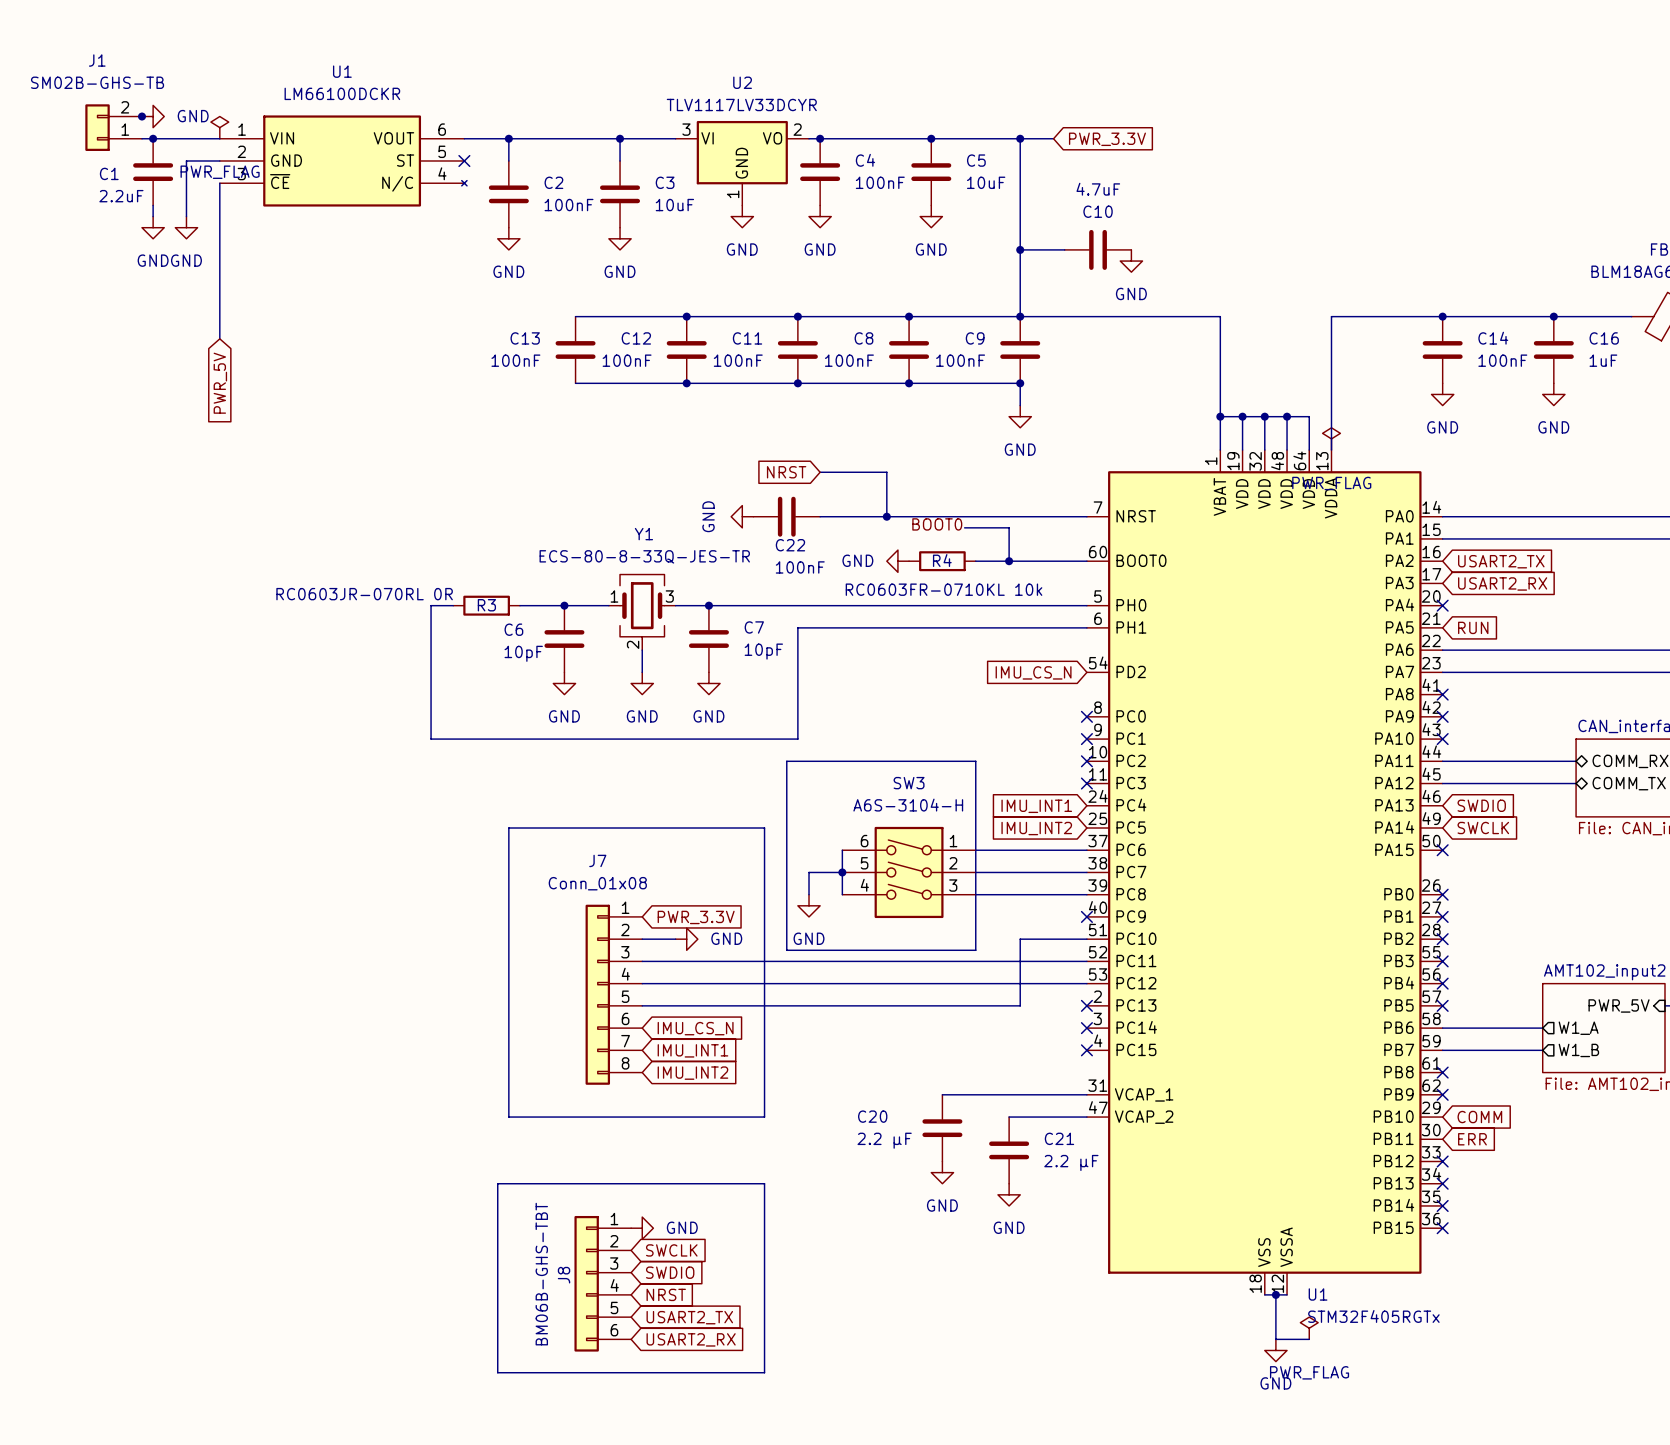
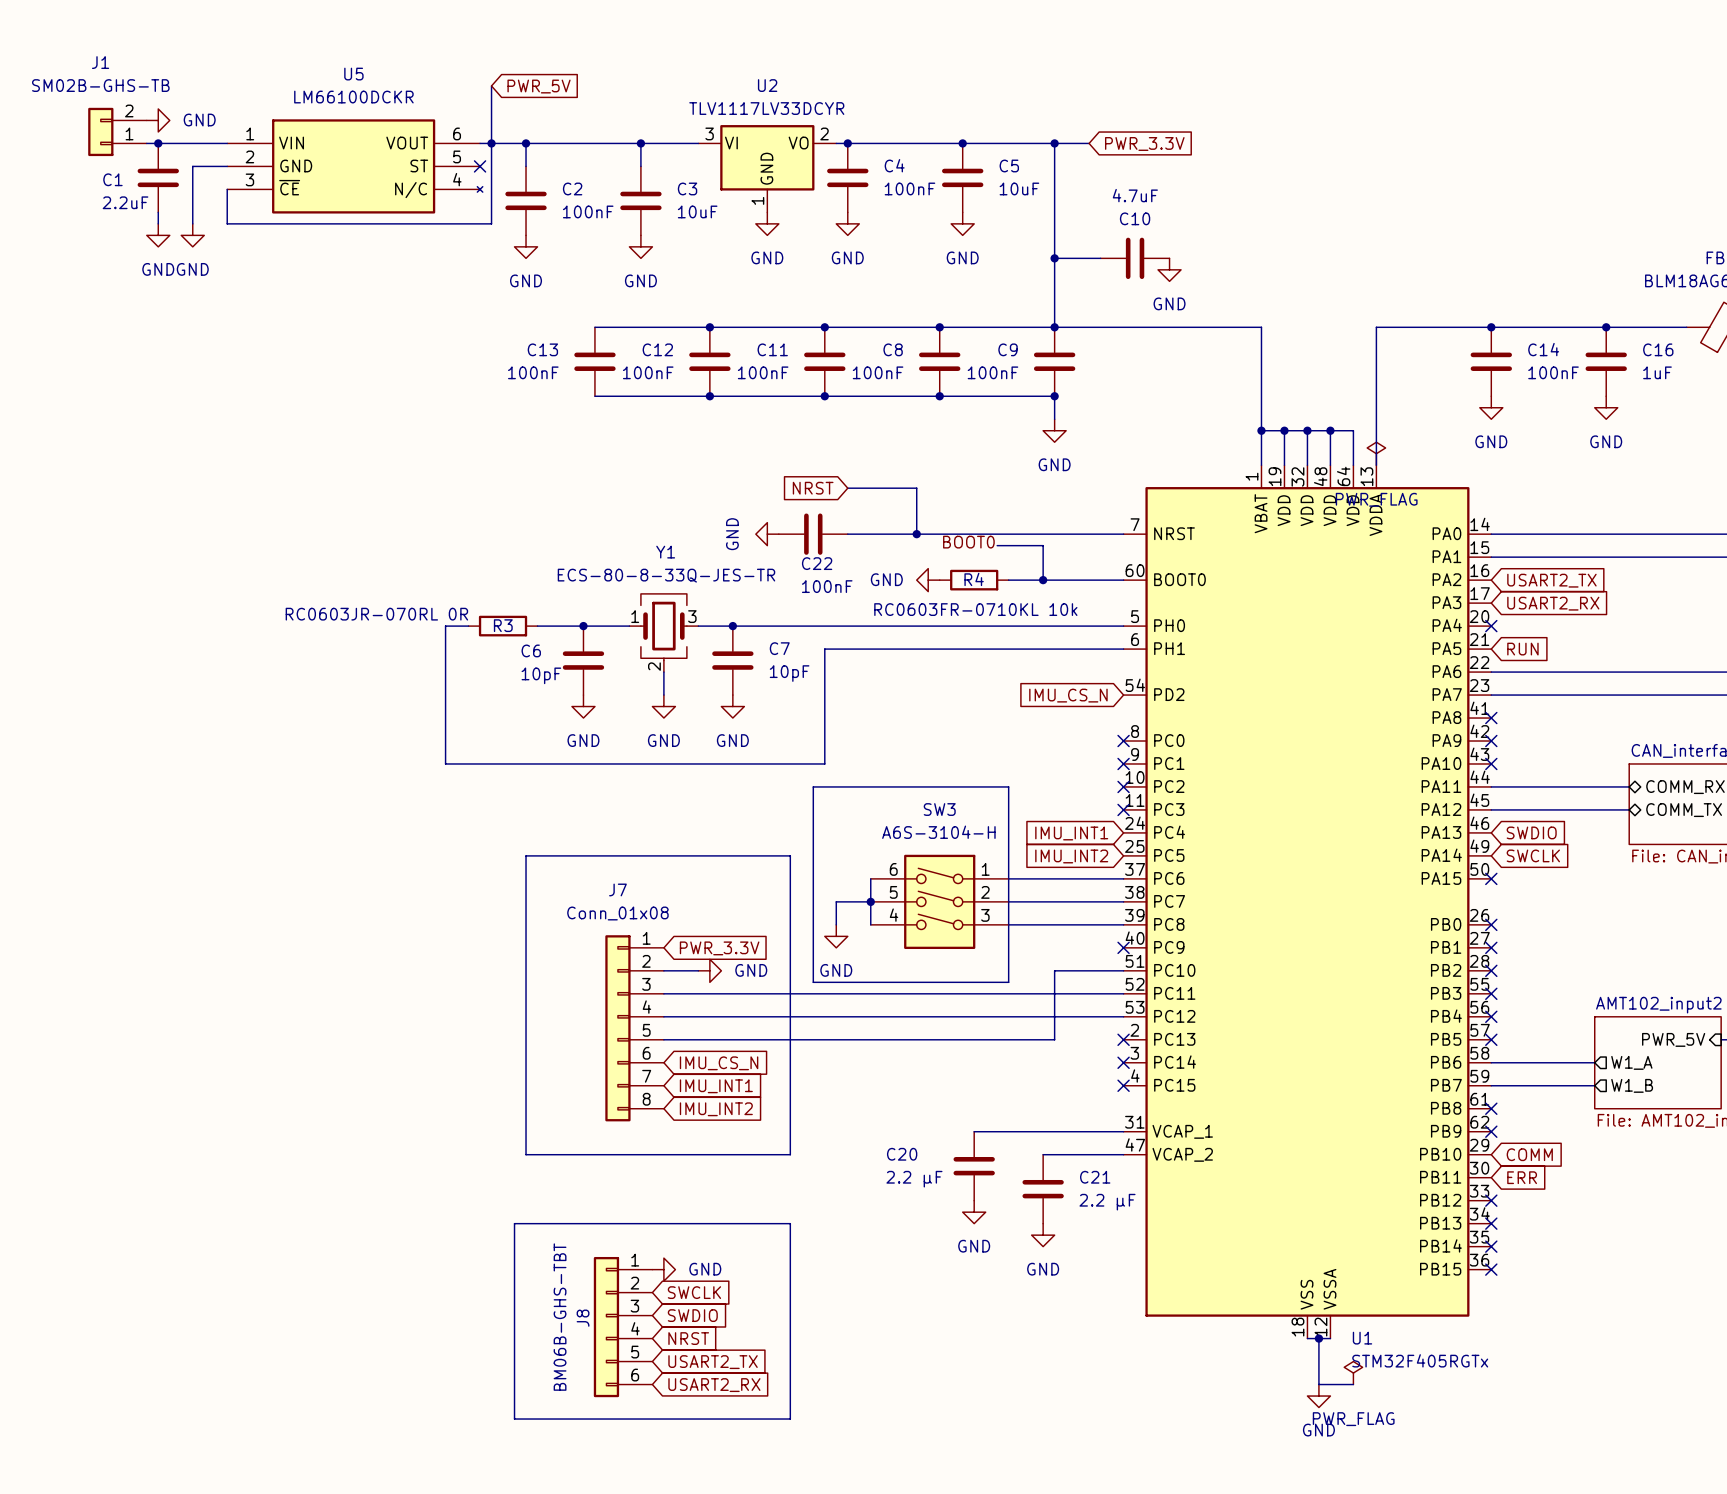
U1 name: U1 (342, 71) -> U5 (353, 74)
global label: none -> PWR_5V (539, 86)
junction: (142, 116) -> none
power symbol: PWR_FLAG (219, 127) -> none
junction: none -> (491, 143)
wire: (219, 216) (219, 338) -> (227, 223) (491, 223) (491, 85)
global label: PWR_5V (220, 383) -> none

